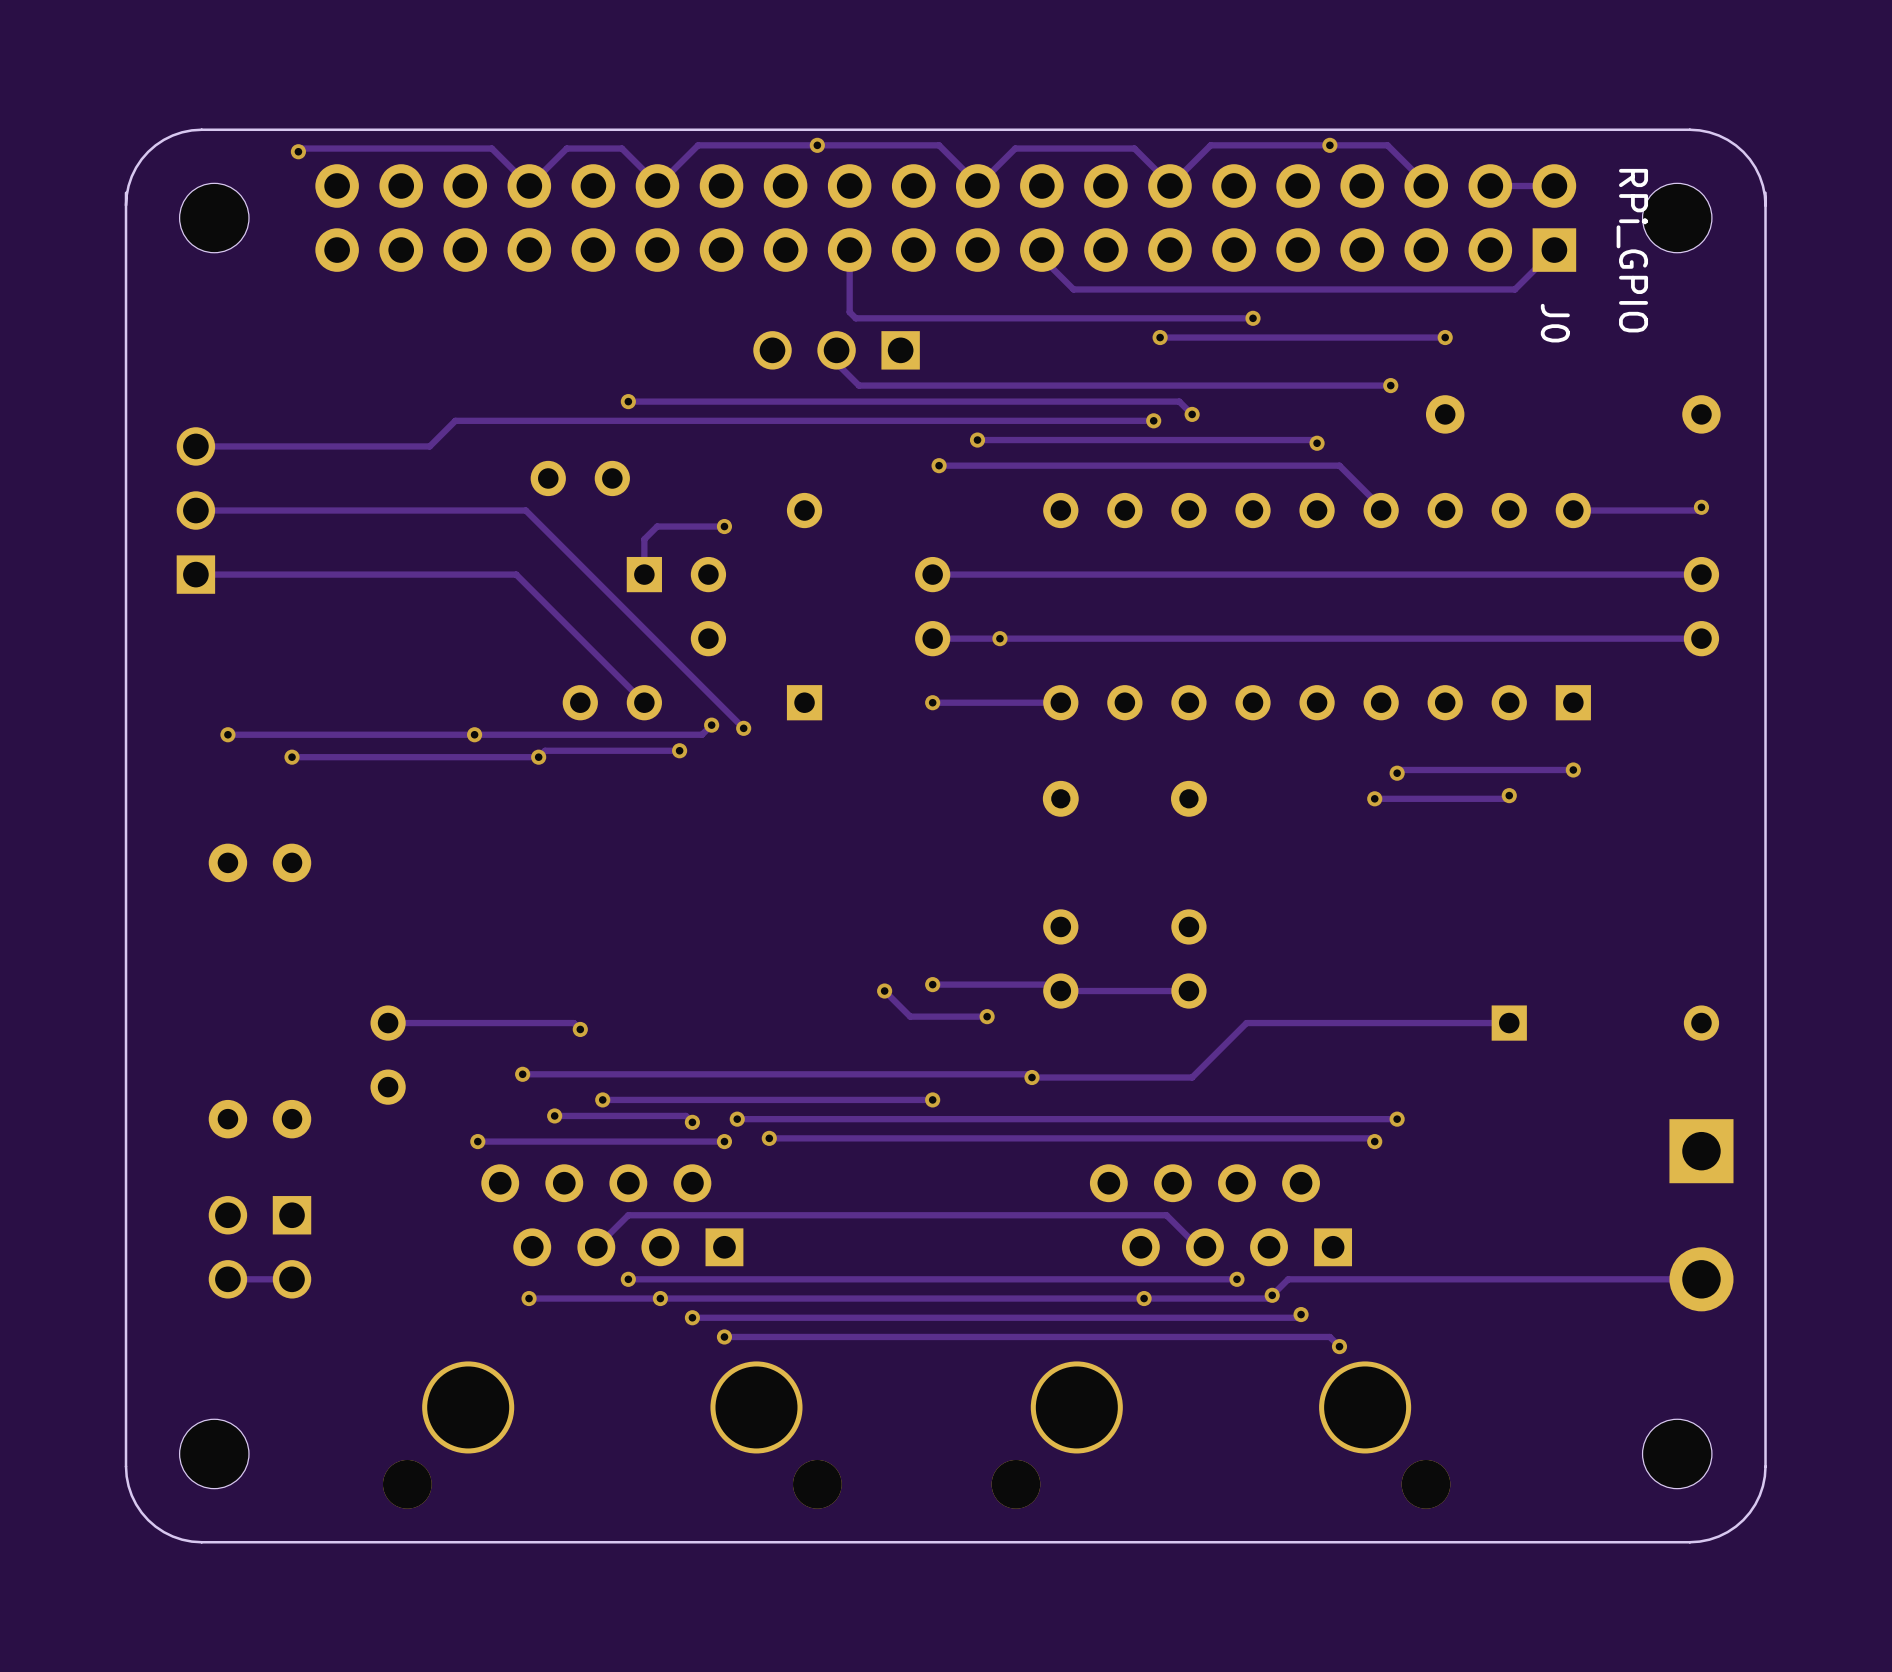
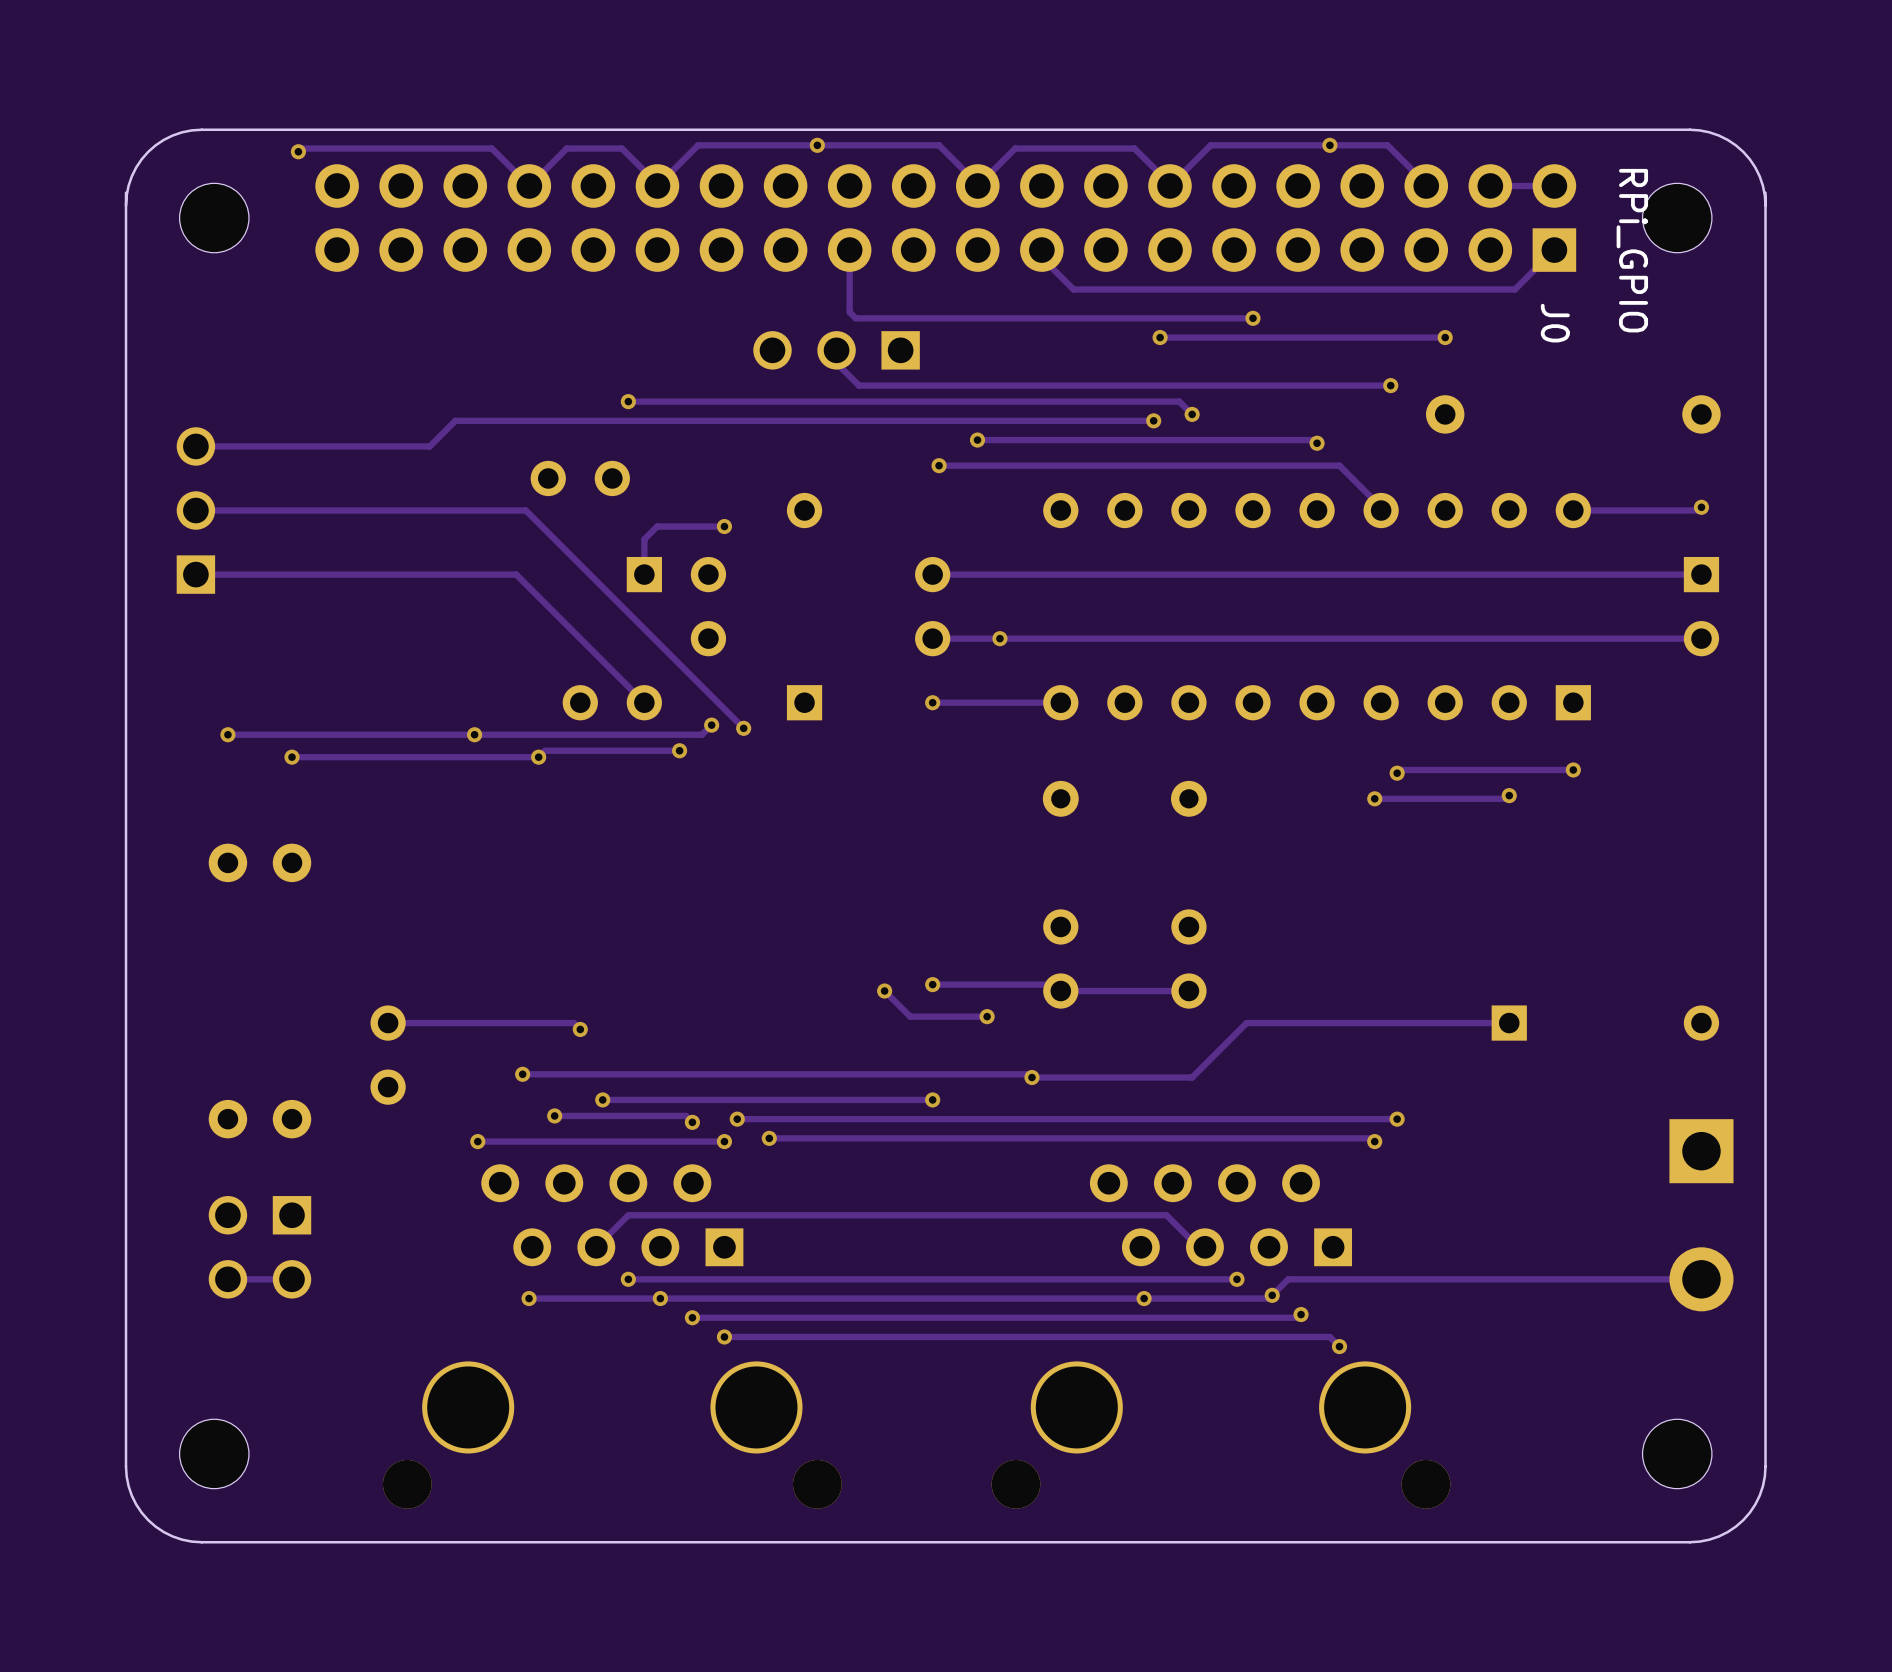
part footprint: [1683, 556, 1720, 657] -> [1683, 556, 1720, 657]

